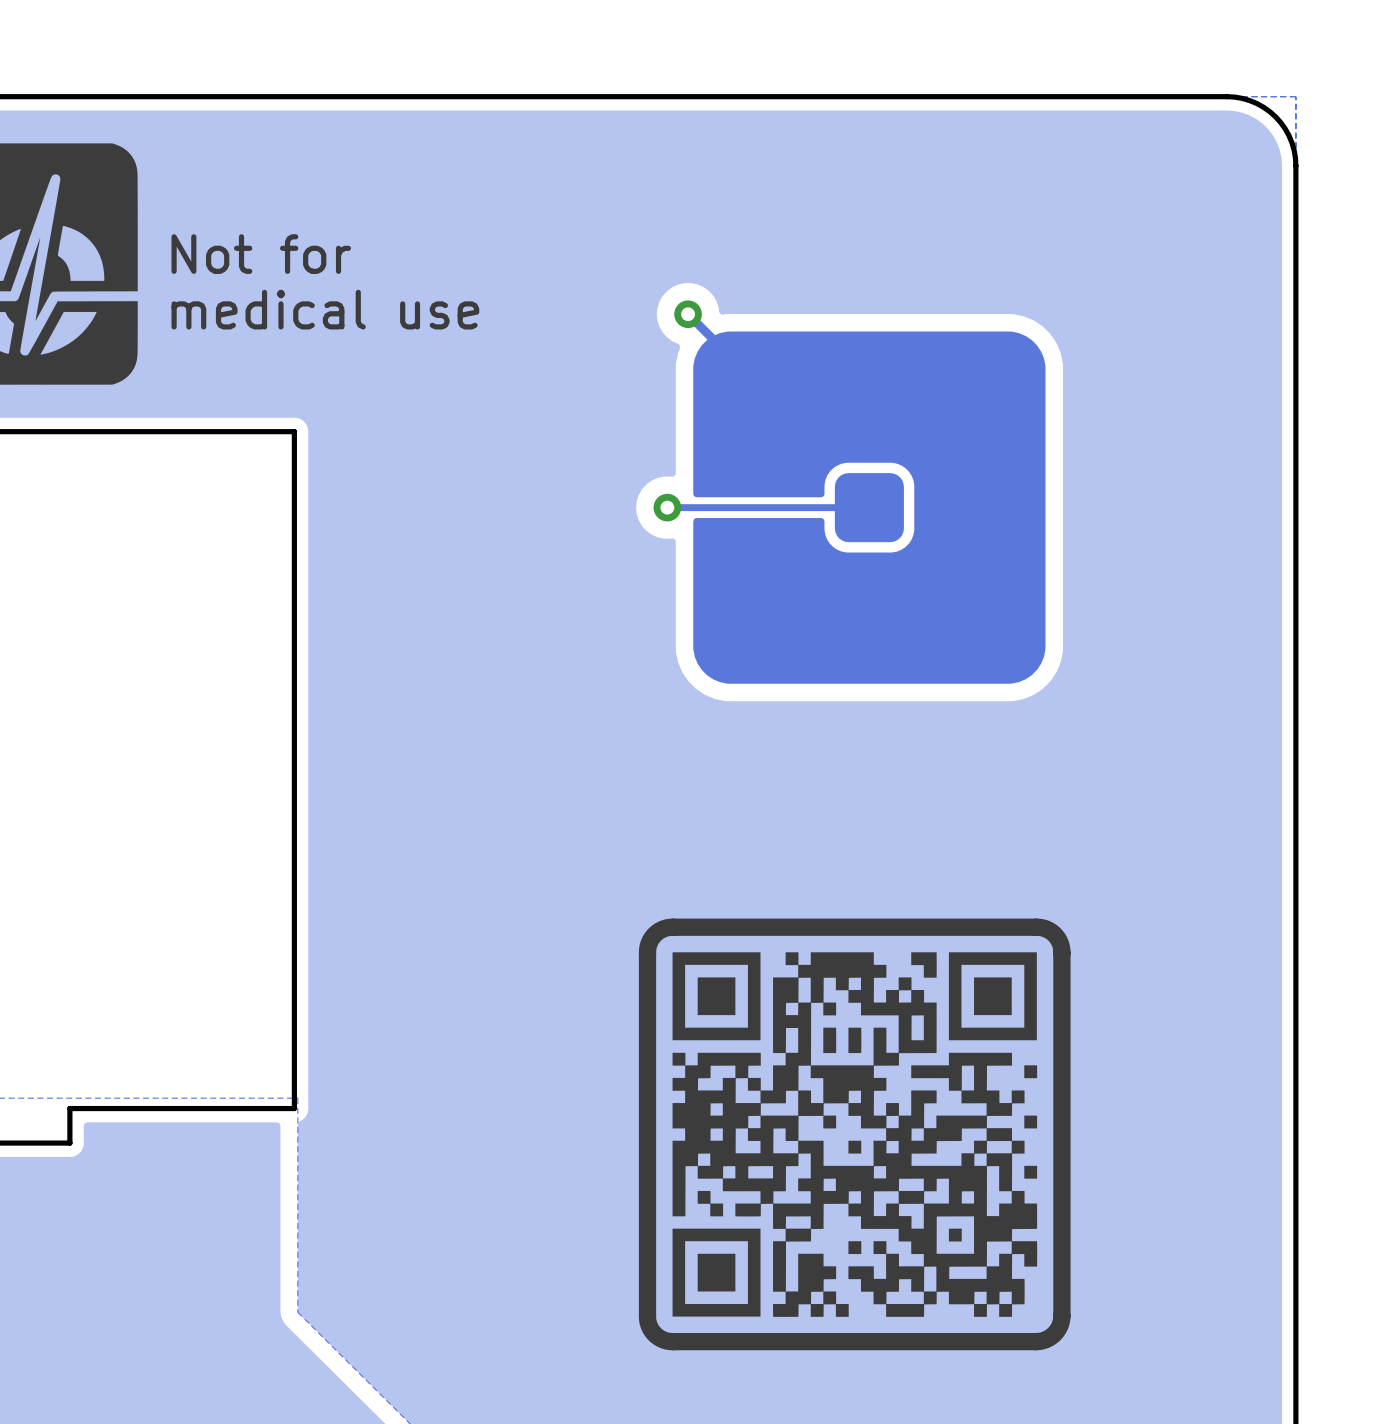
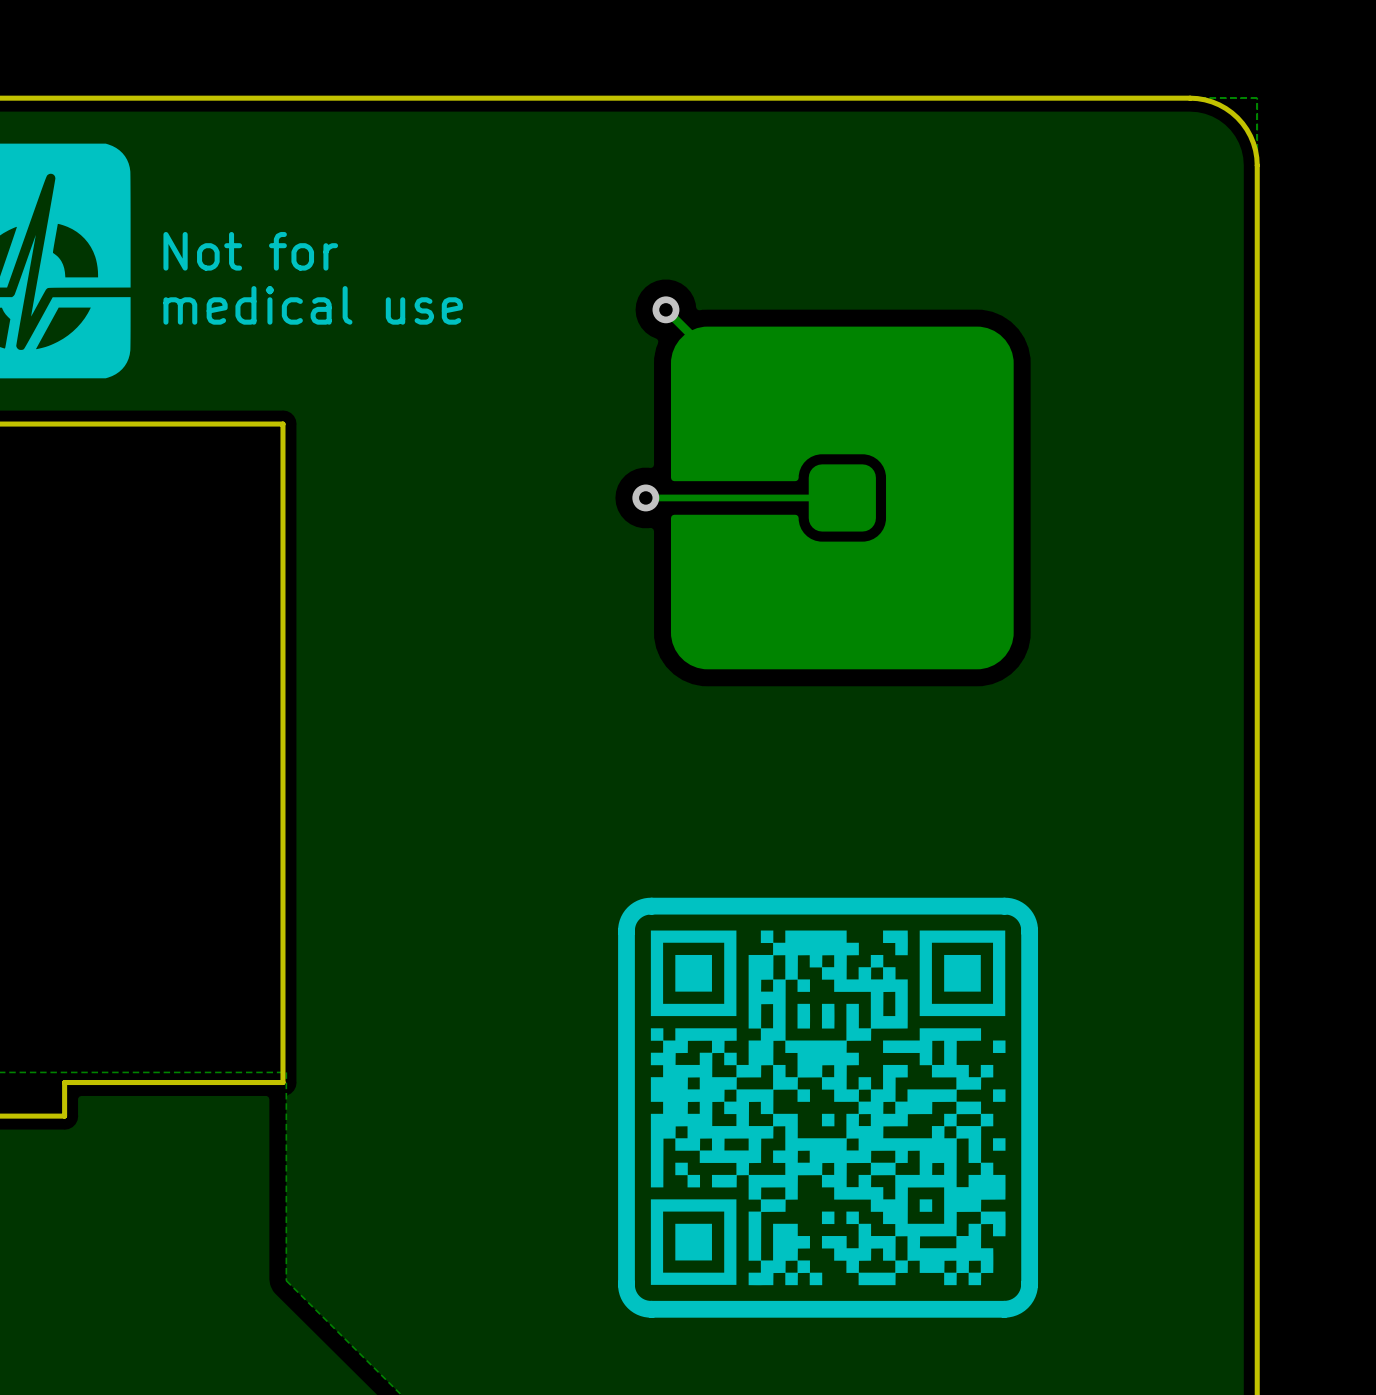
part footprint: [693, 331, 1046, 684] -> [671, 326, 1014, 670]

